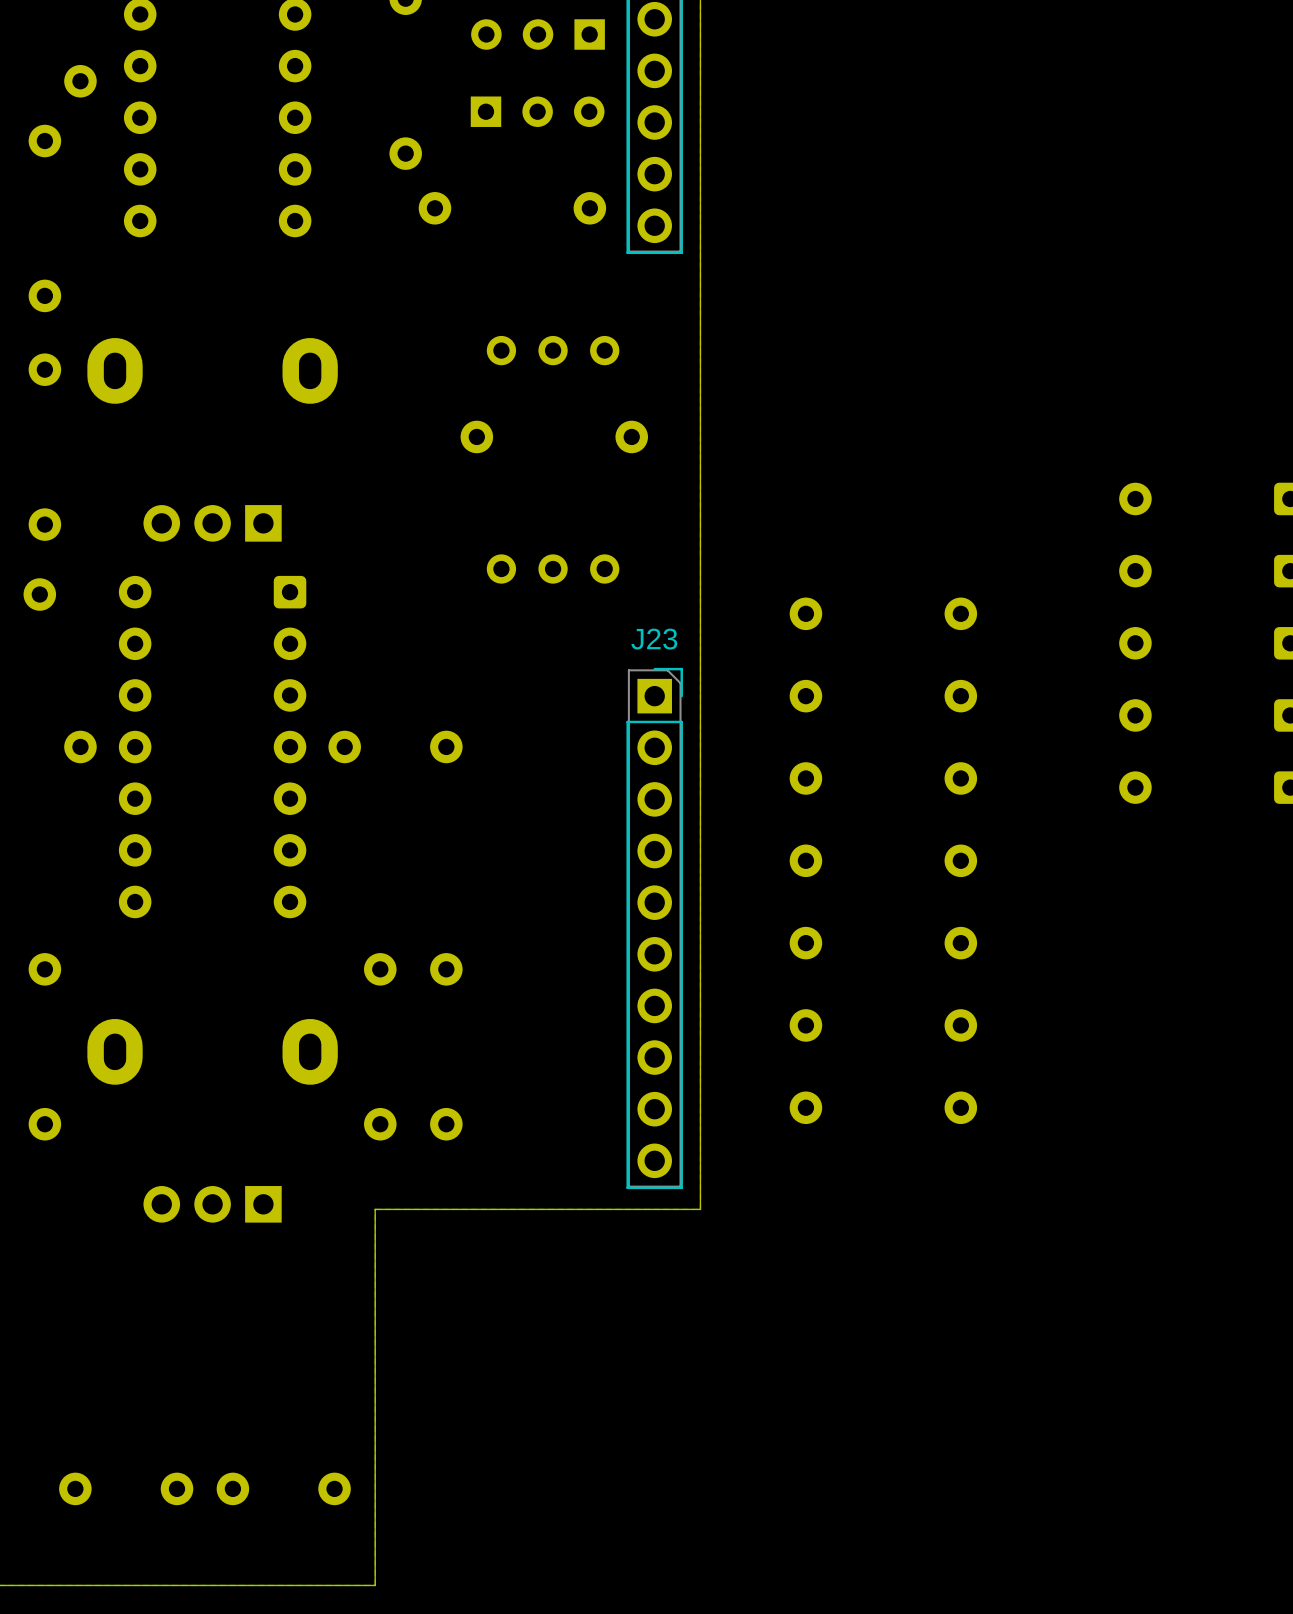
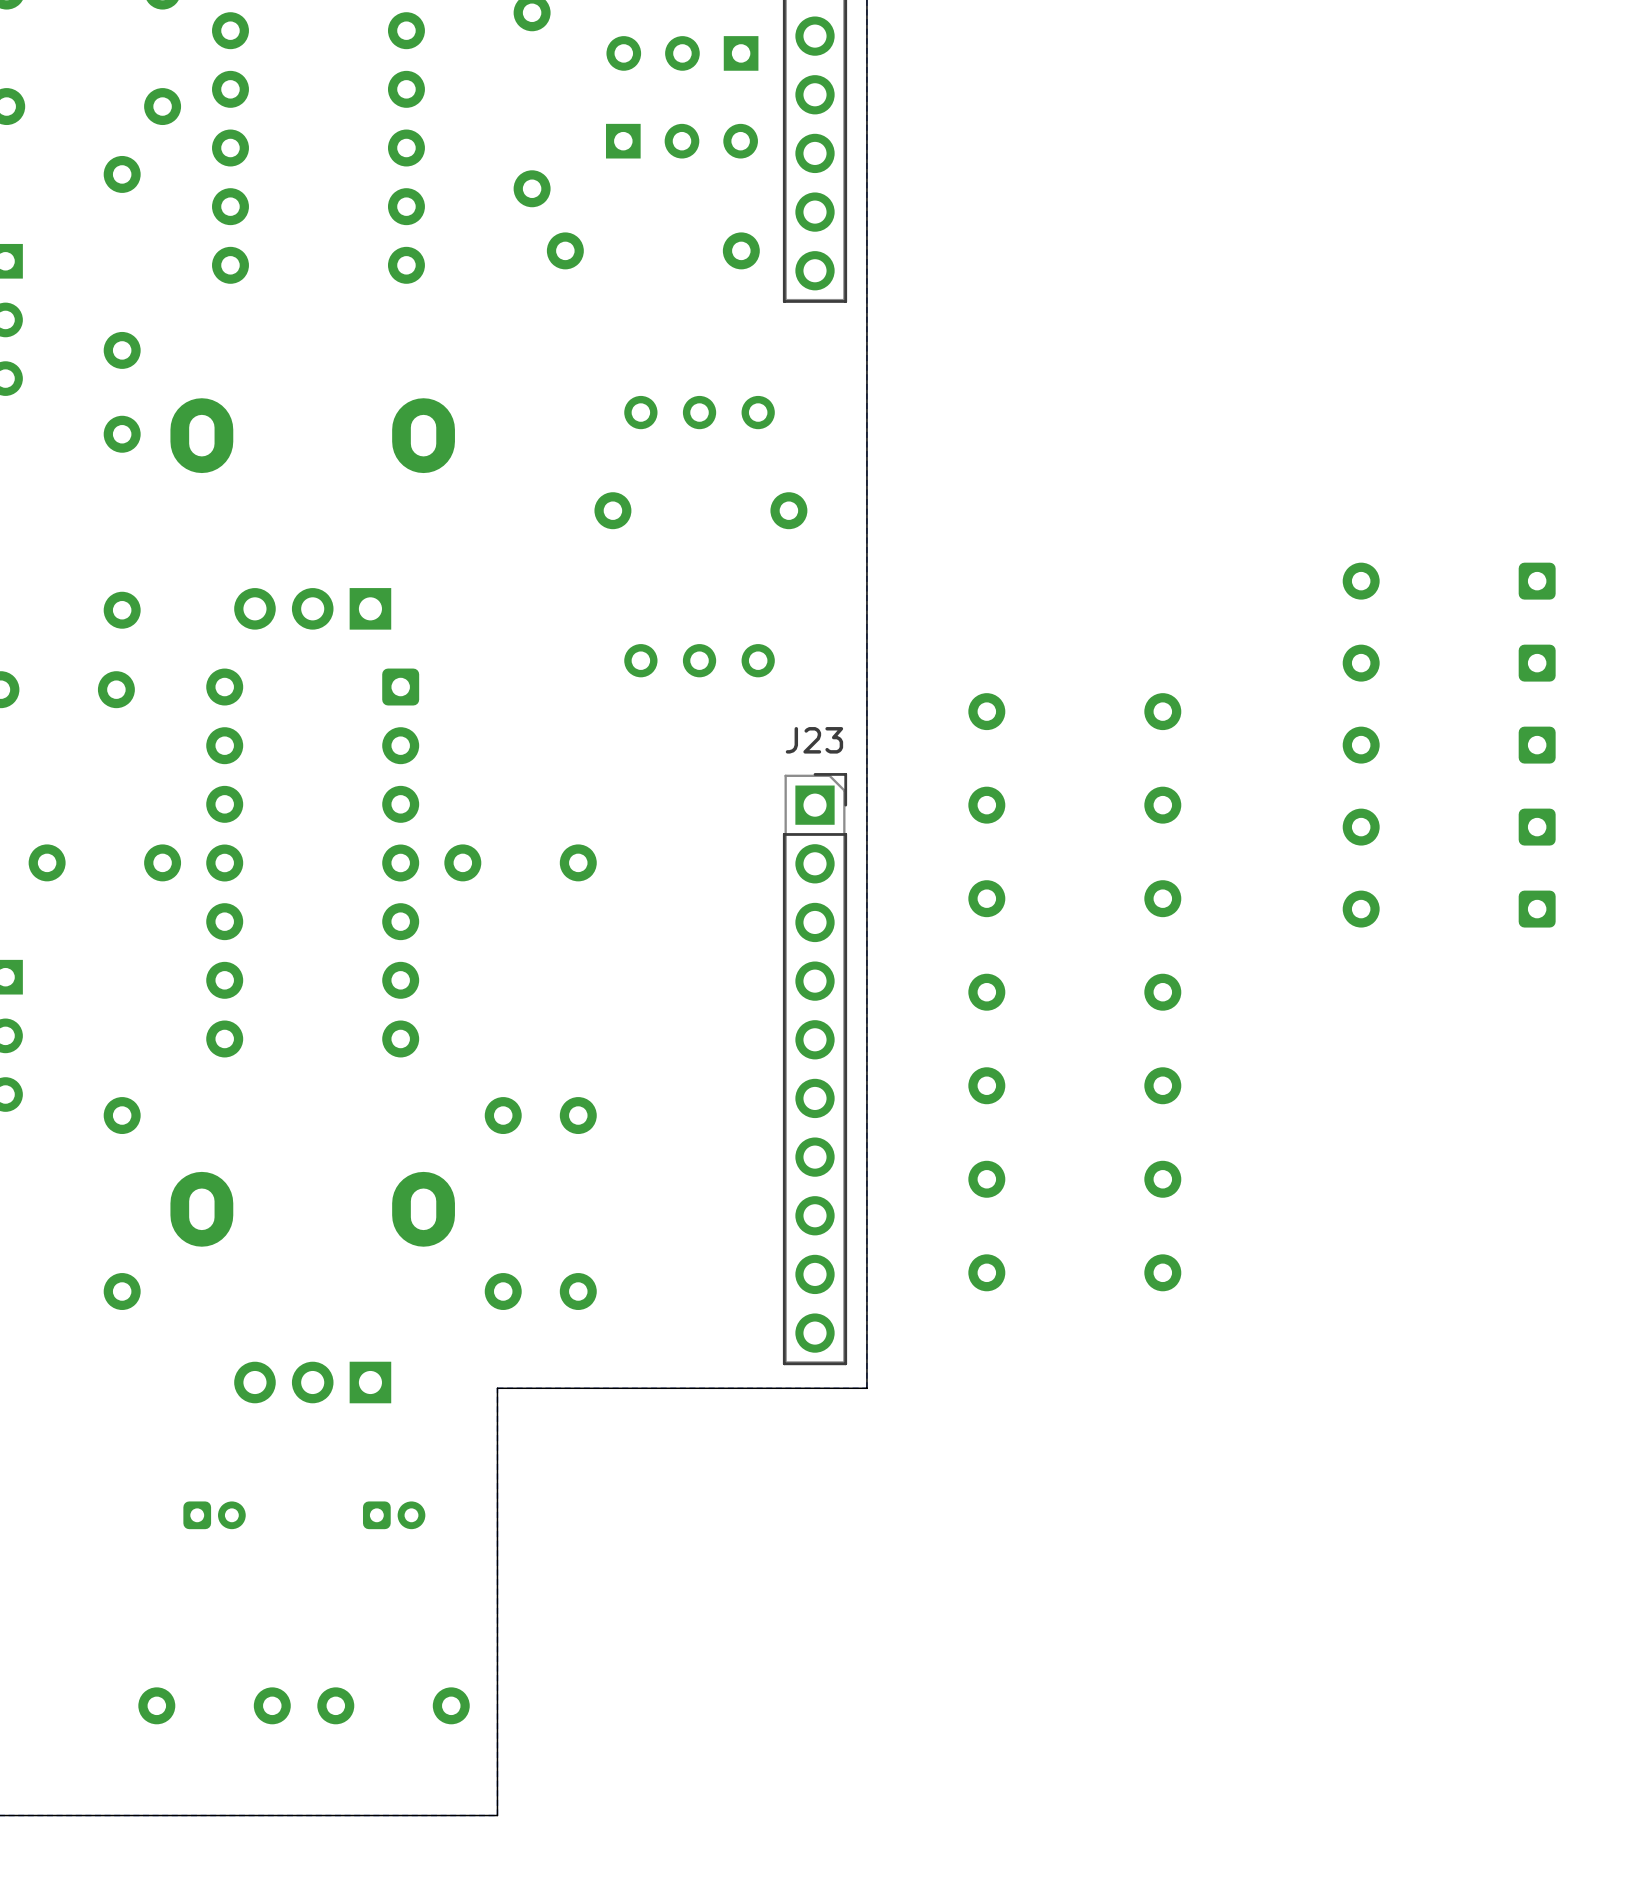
part: none -> (214, 1515)
part: none -> (394, 1515)

